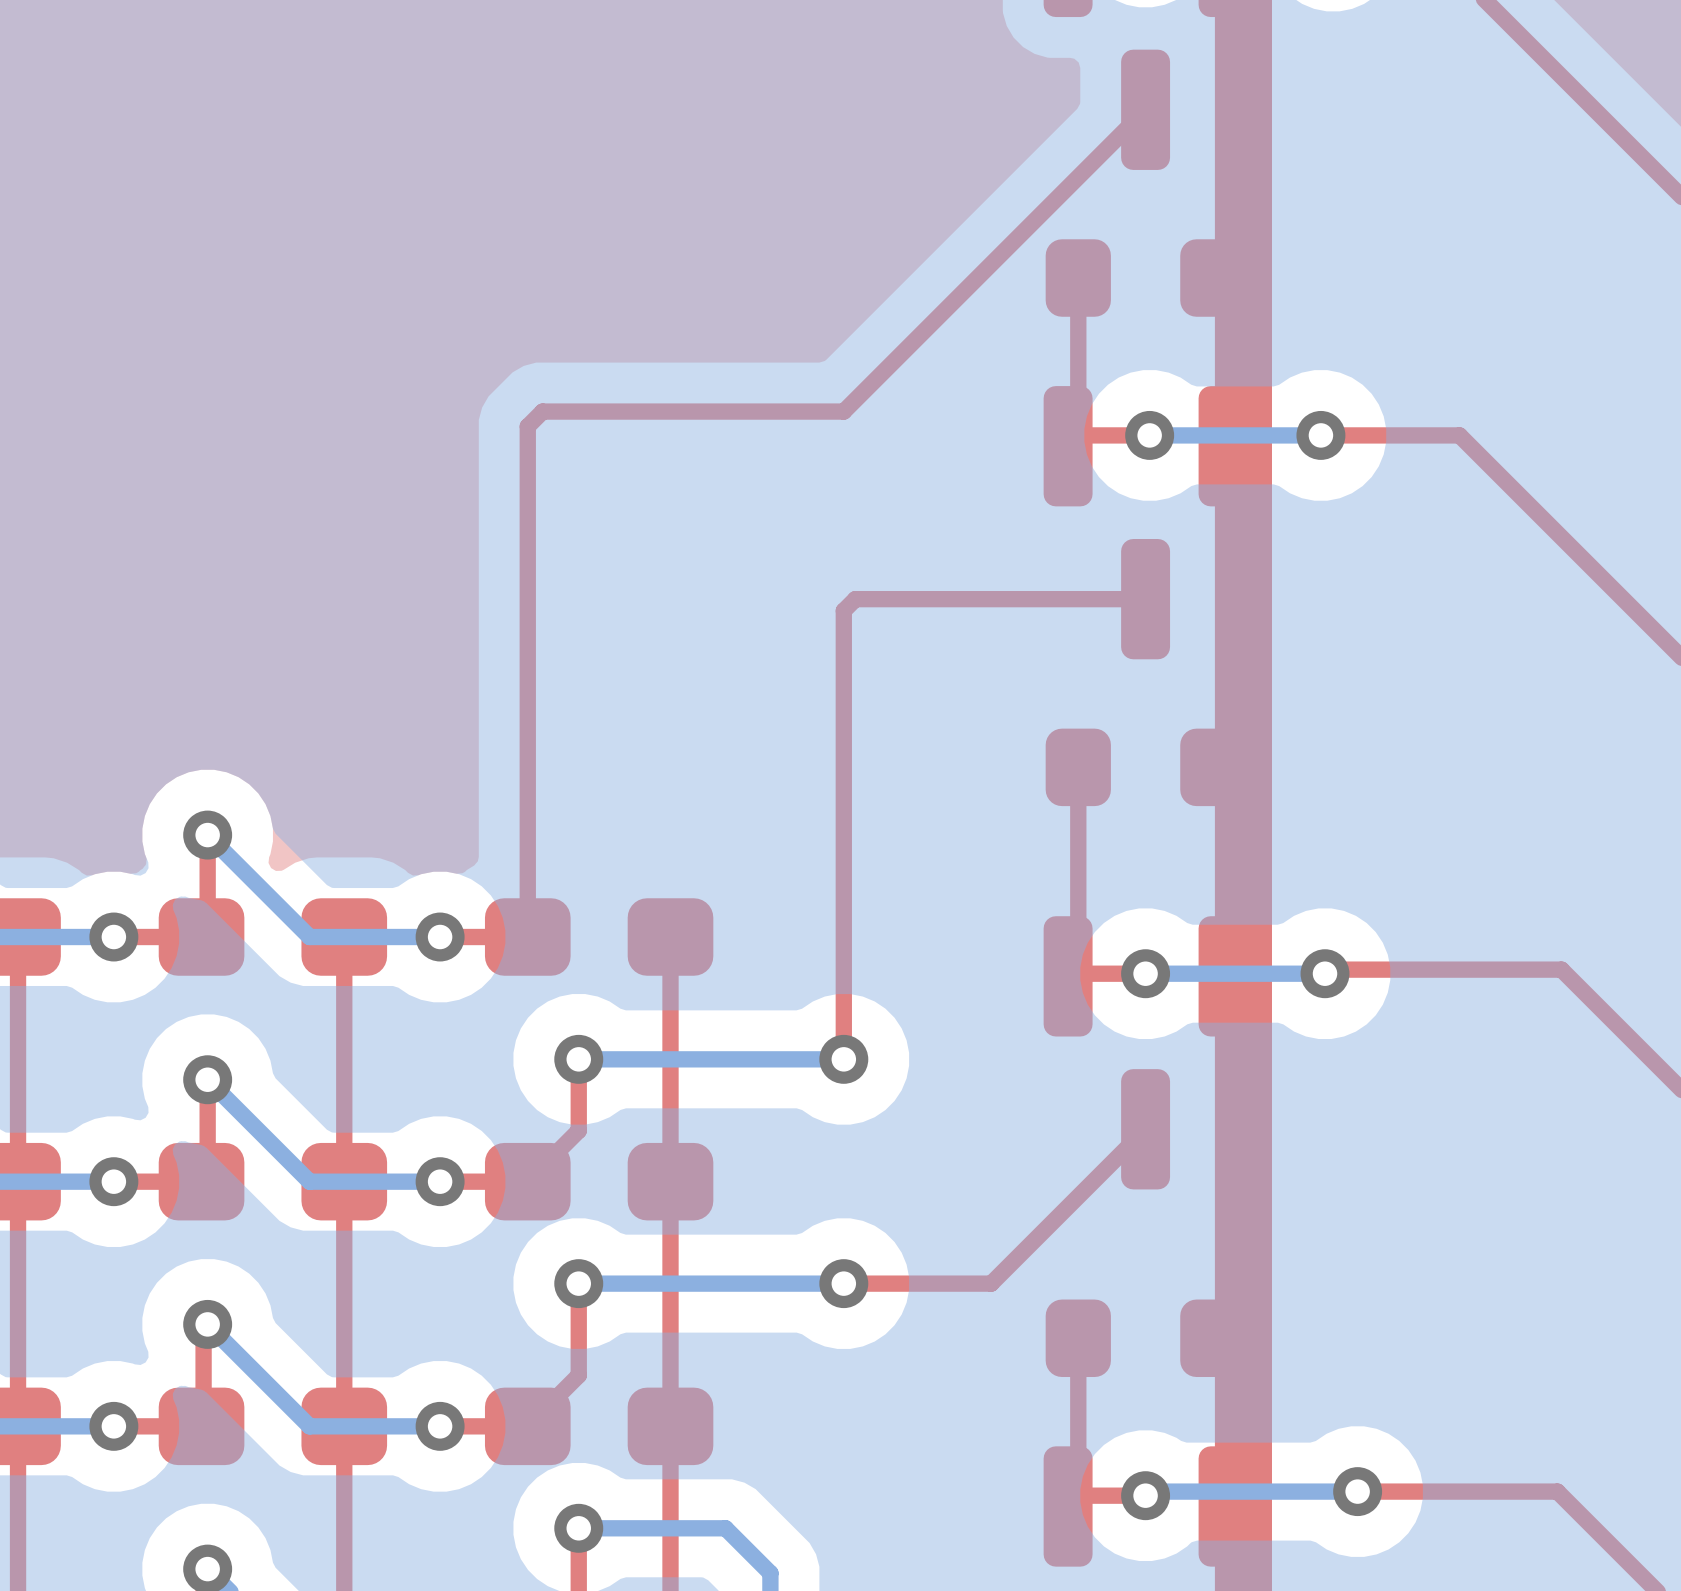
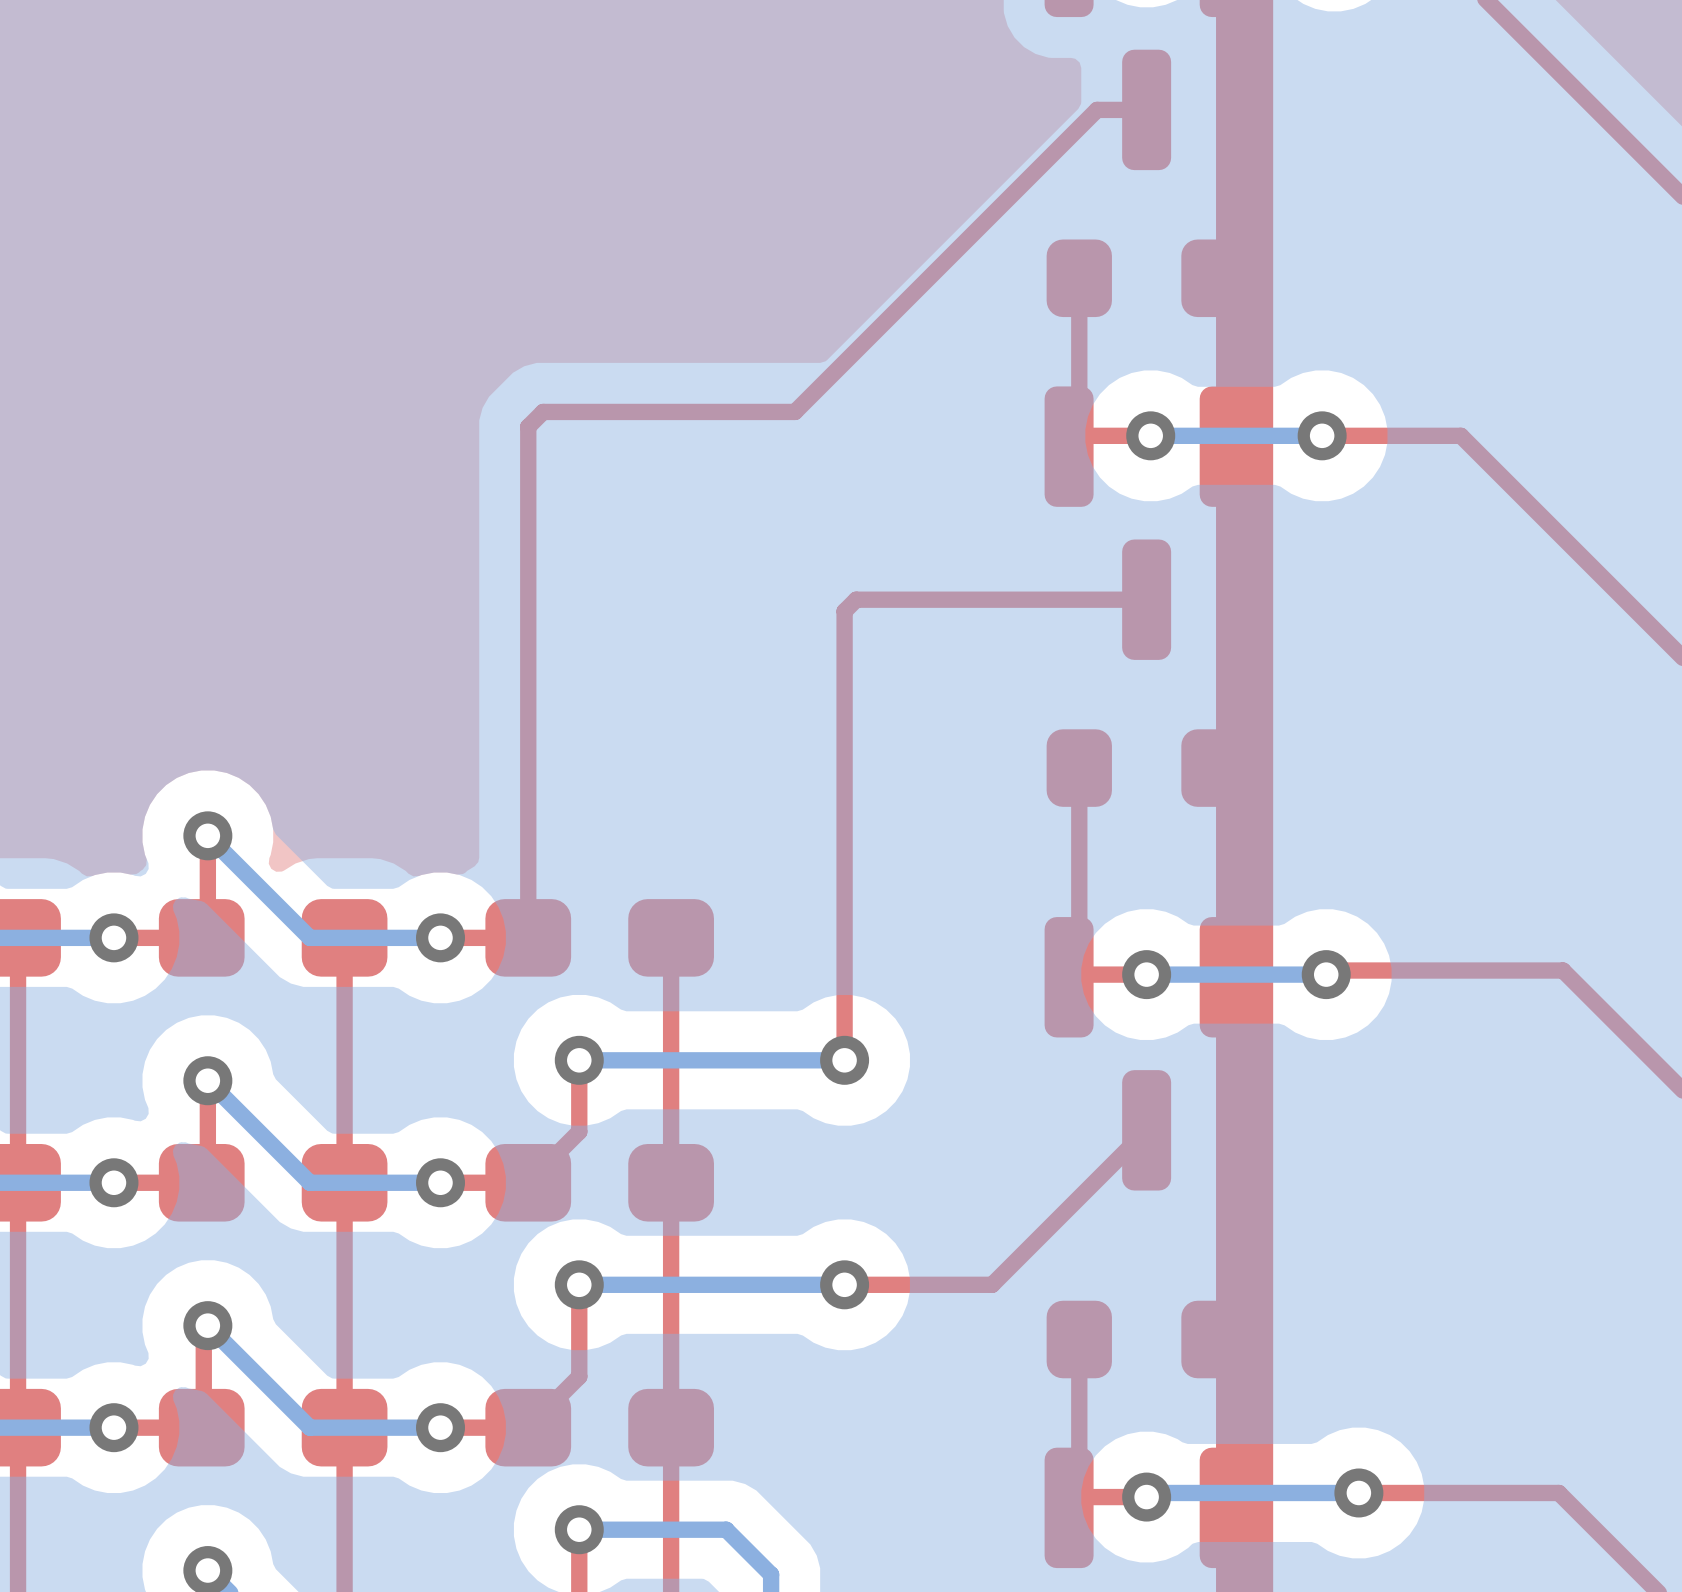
top track: (1145, 109) (843, 411) (794, 411) -> (1146, 109) (1097, 109) (795, 411)

